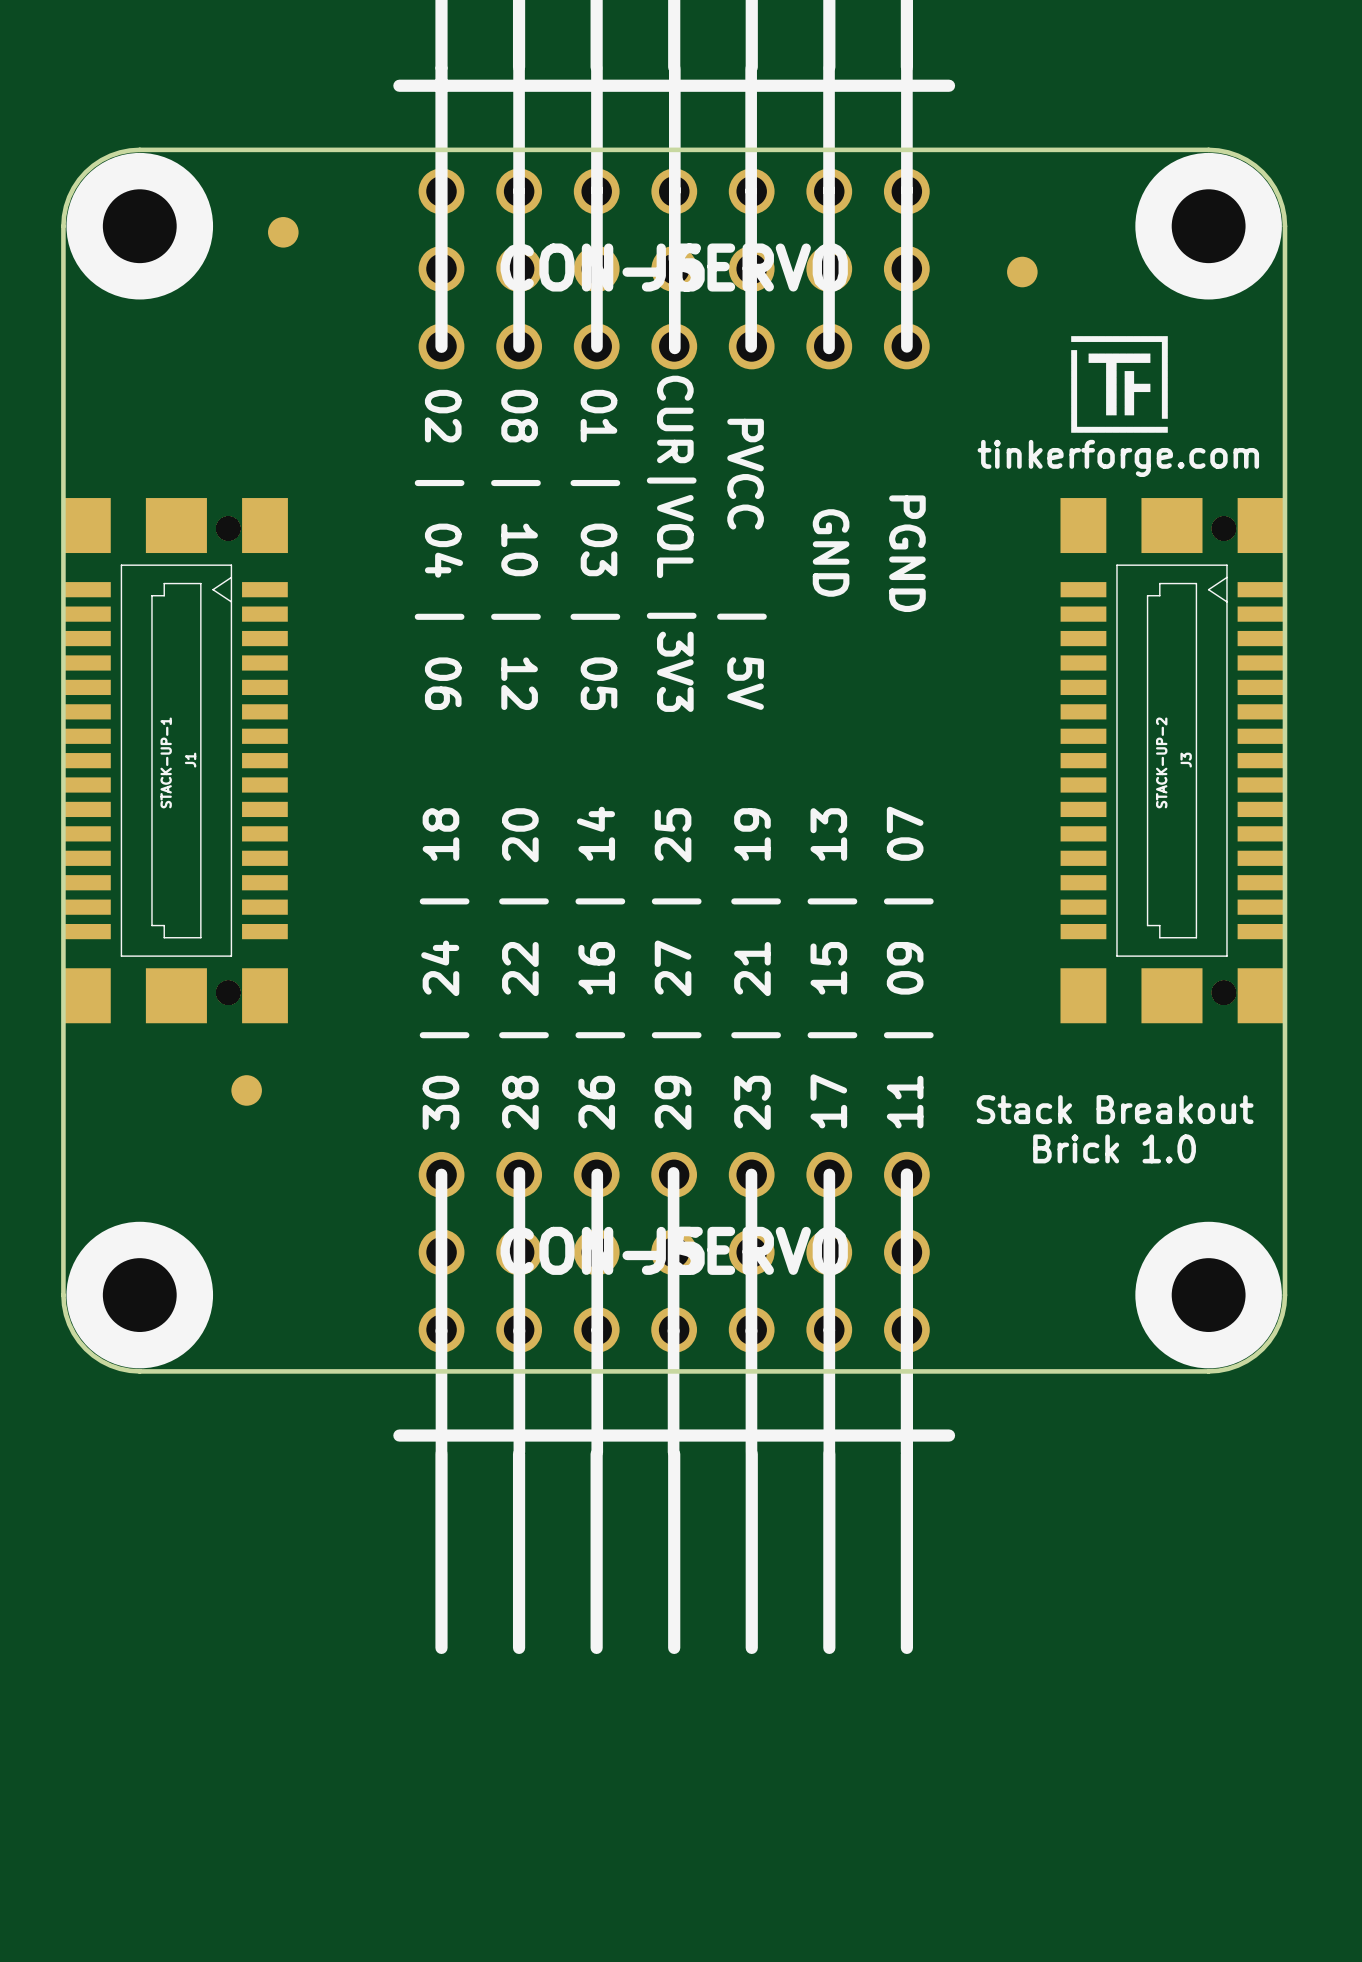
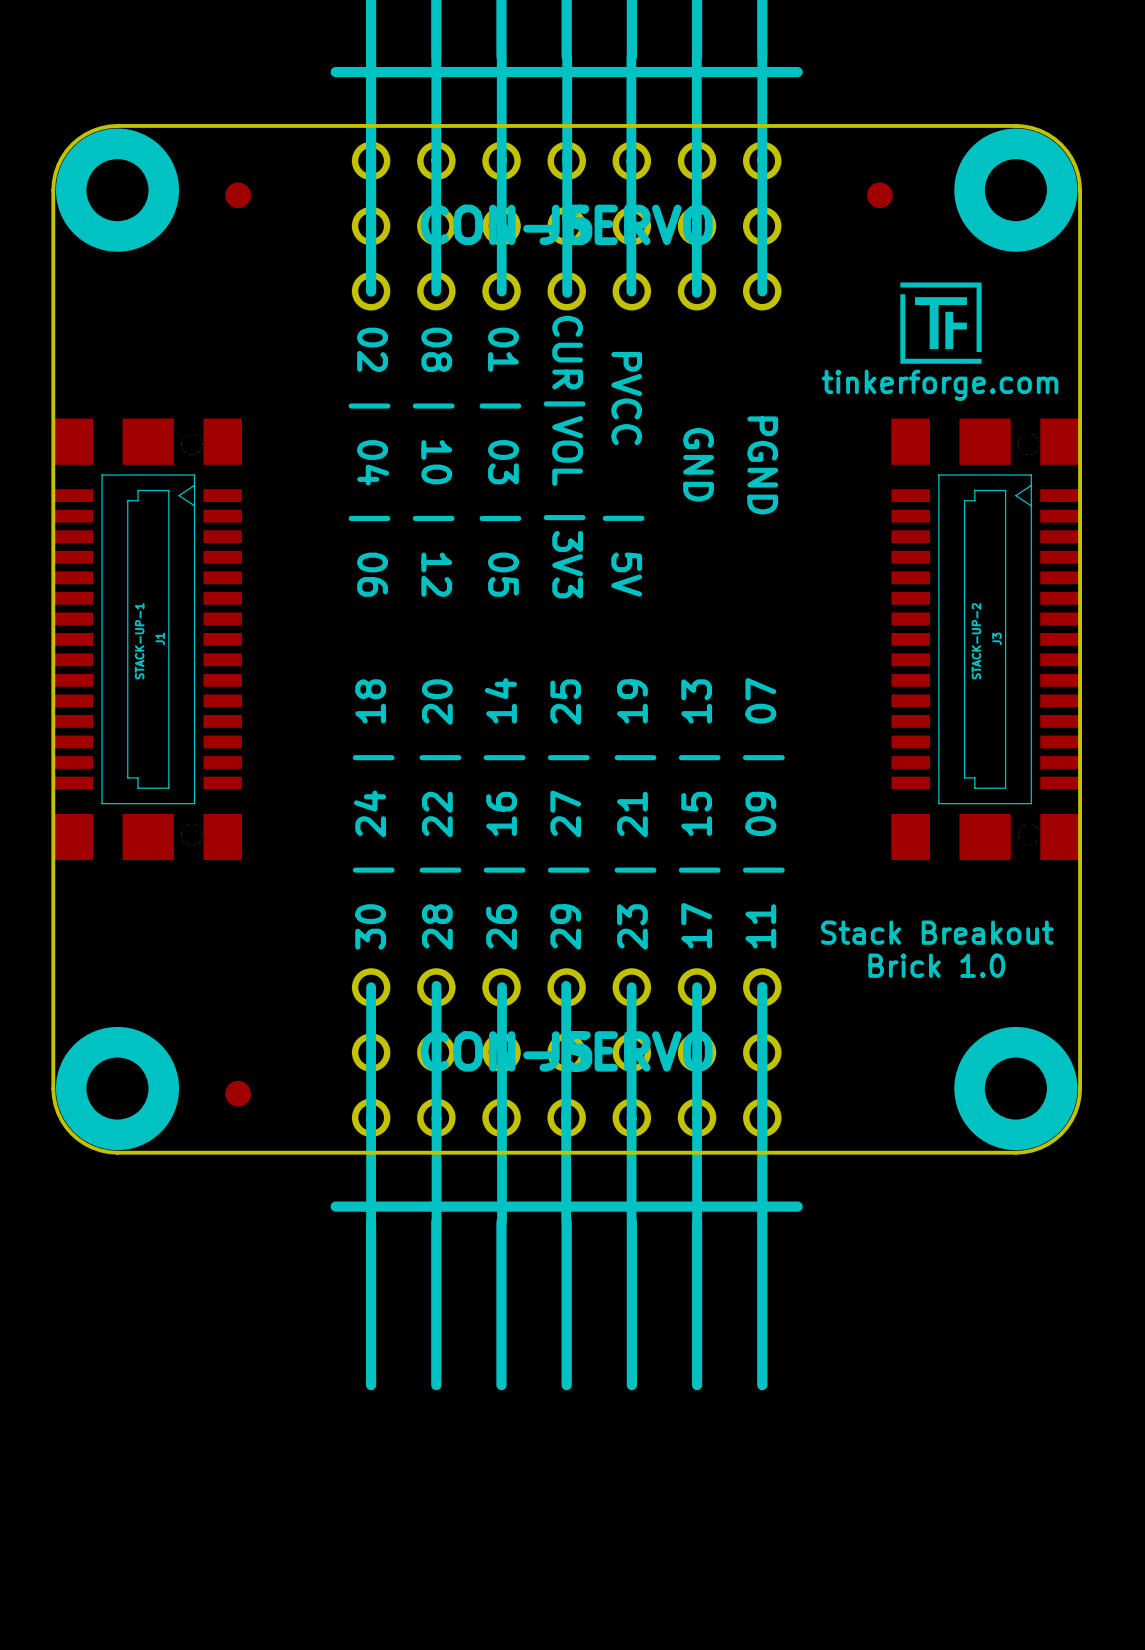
part position: (1022, 272) -> (879, 195)
part position: (246, 1090) -> (238, 1093)

